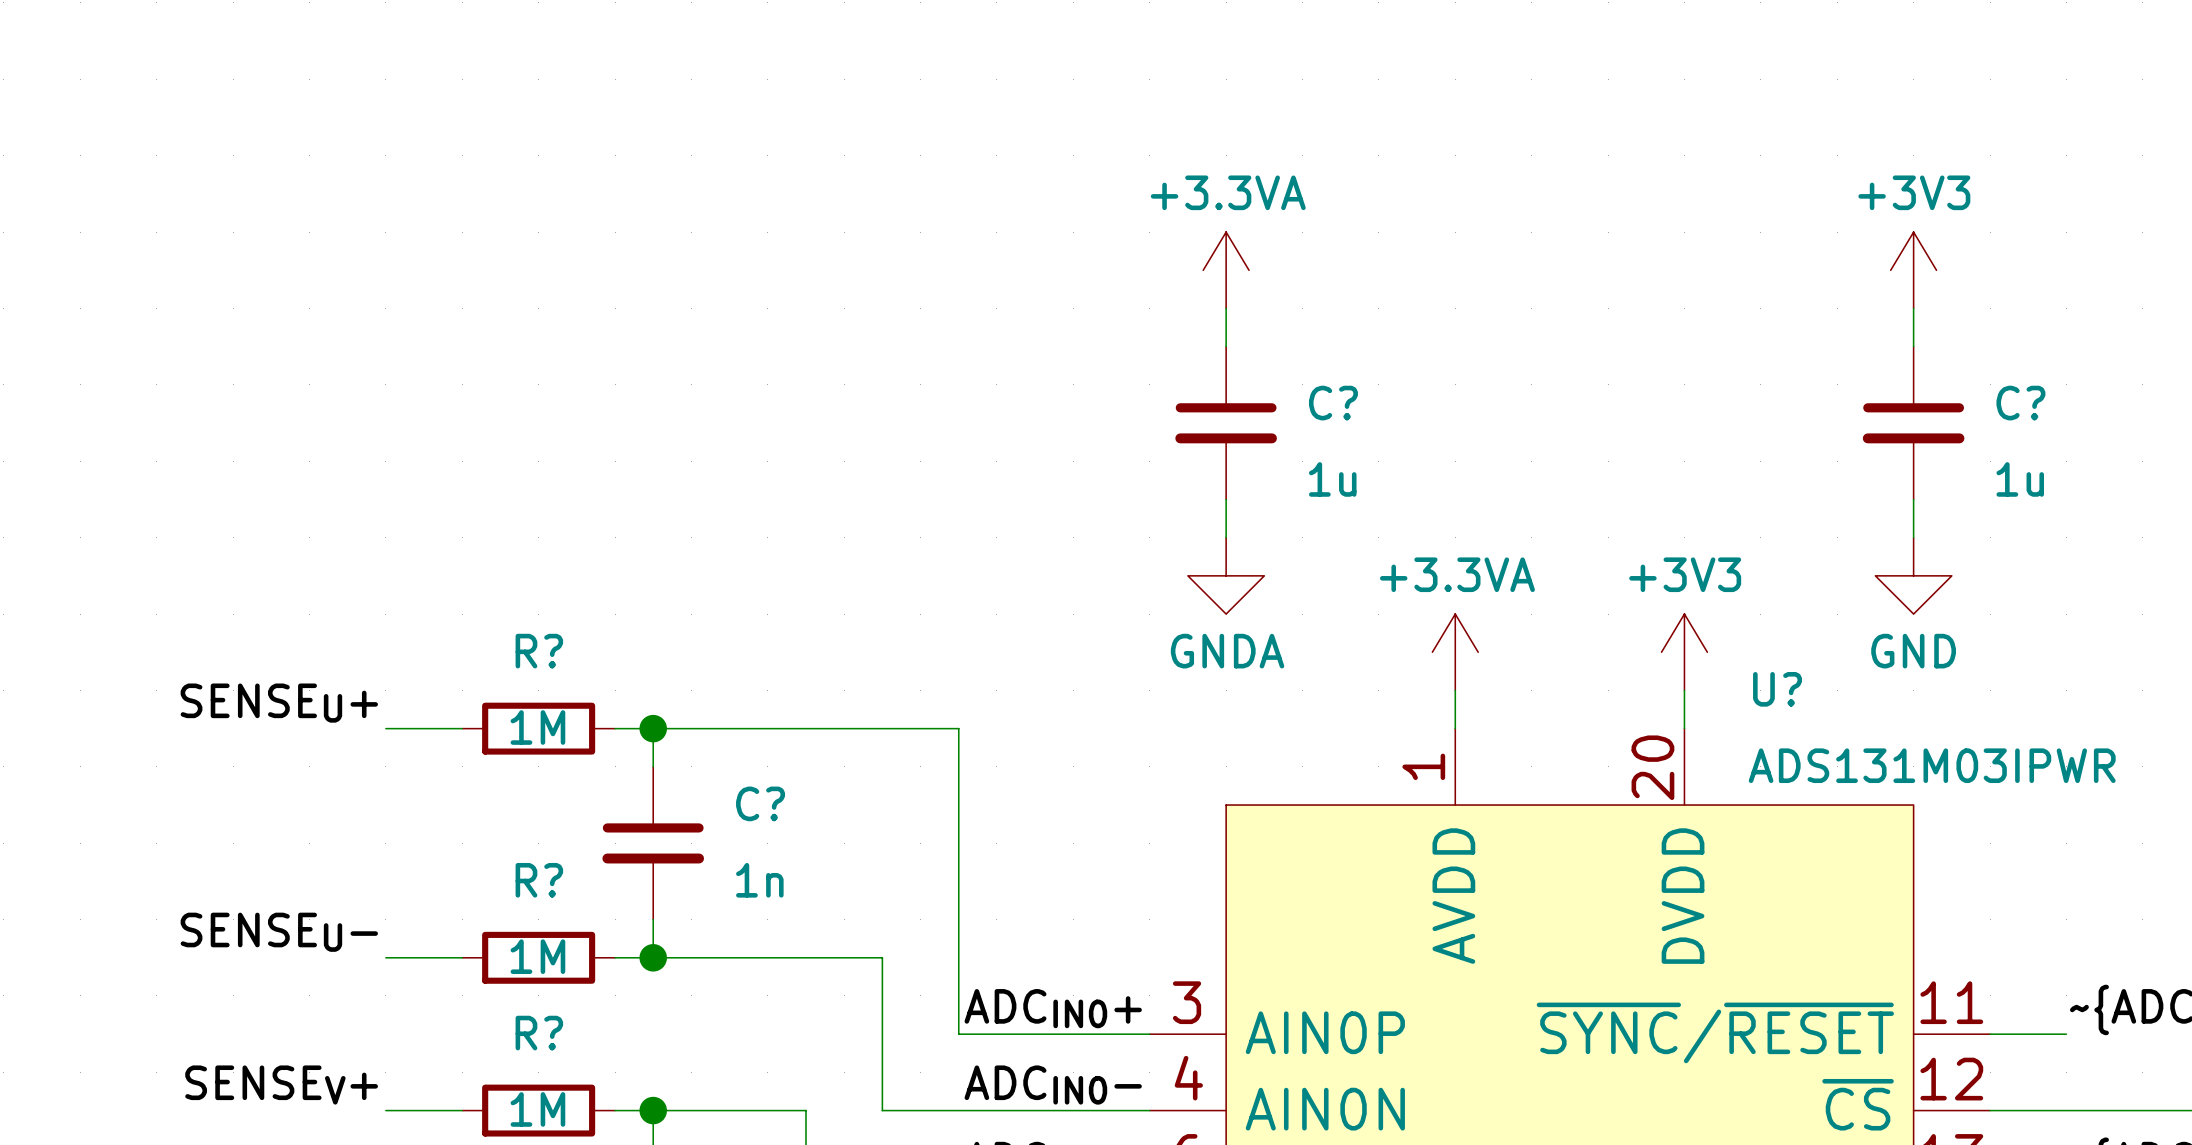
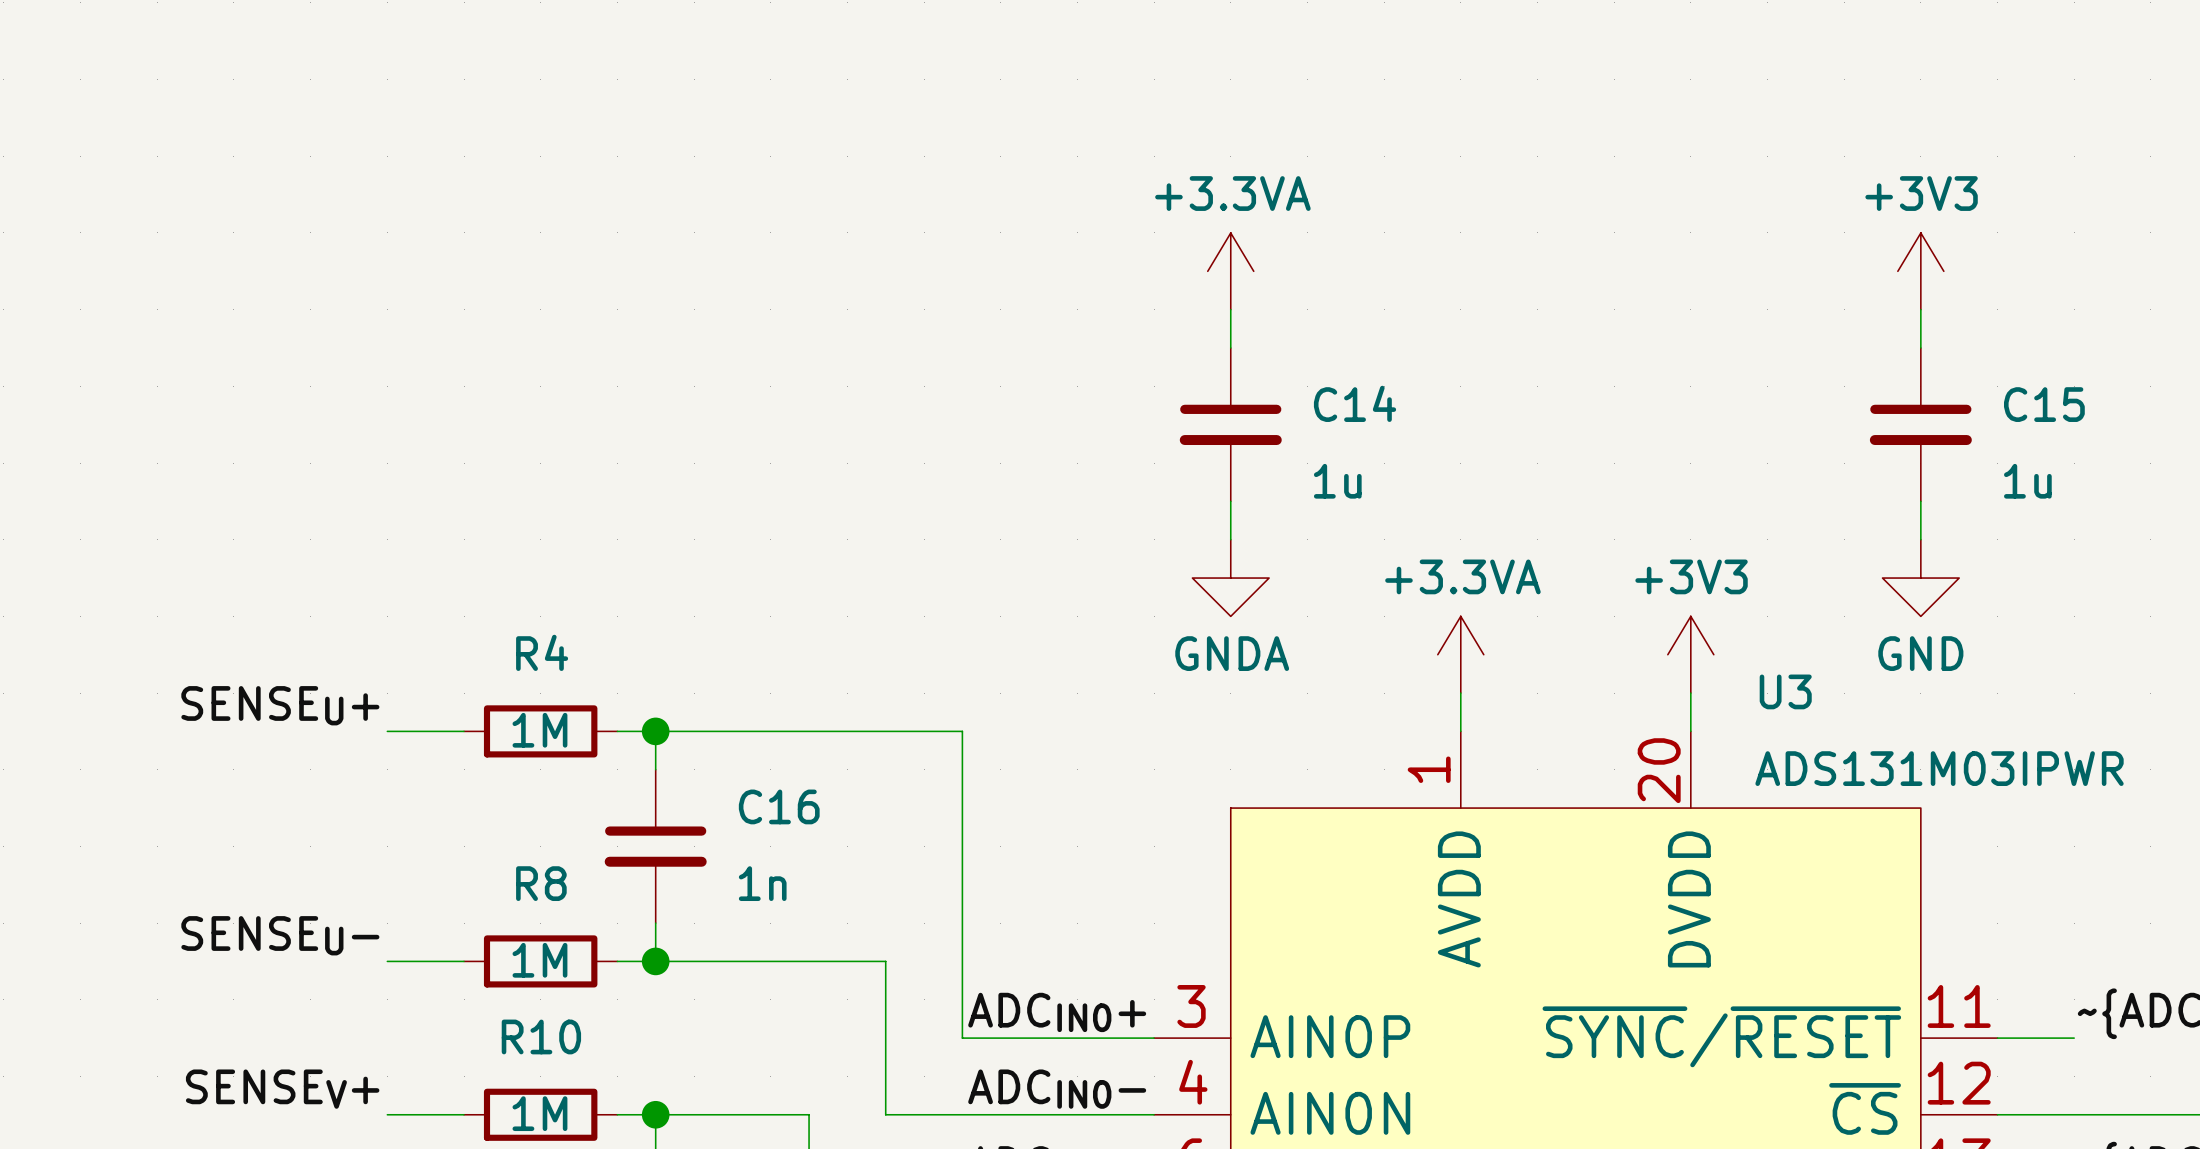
C? name: C? (1333, 403) -> C14 (1355, 403)
C? name: C? (2020, 403) -> C15 (2044, 404)
R? name: R? (539, 651) -> R4 (542, 652)
U? name: U? (1777, 689) -> U3 (1785, 691)
C? name: C? (760, 803) -> C16 (779, 806)
R? name: R? (539, 880) -> R8 (541, 883)
R? name: R? (539, 1033) -> R10 (541, 1036)

